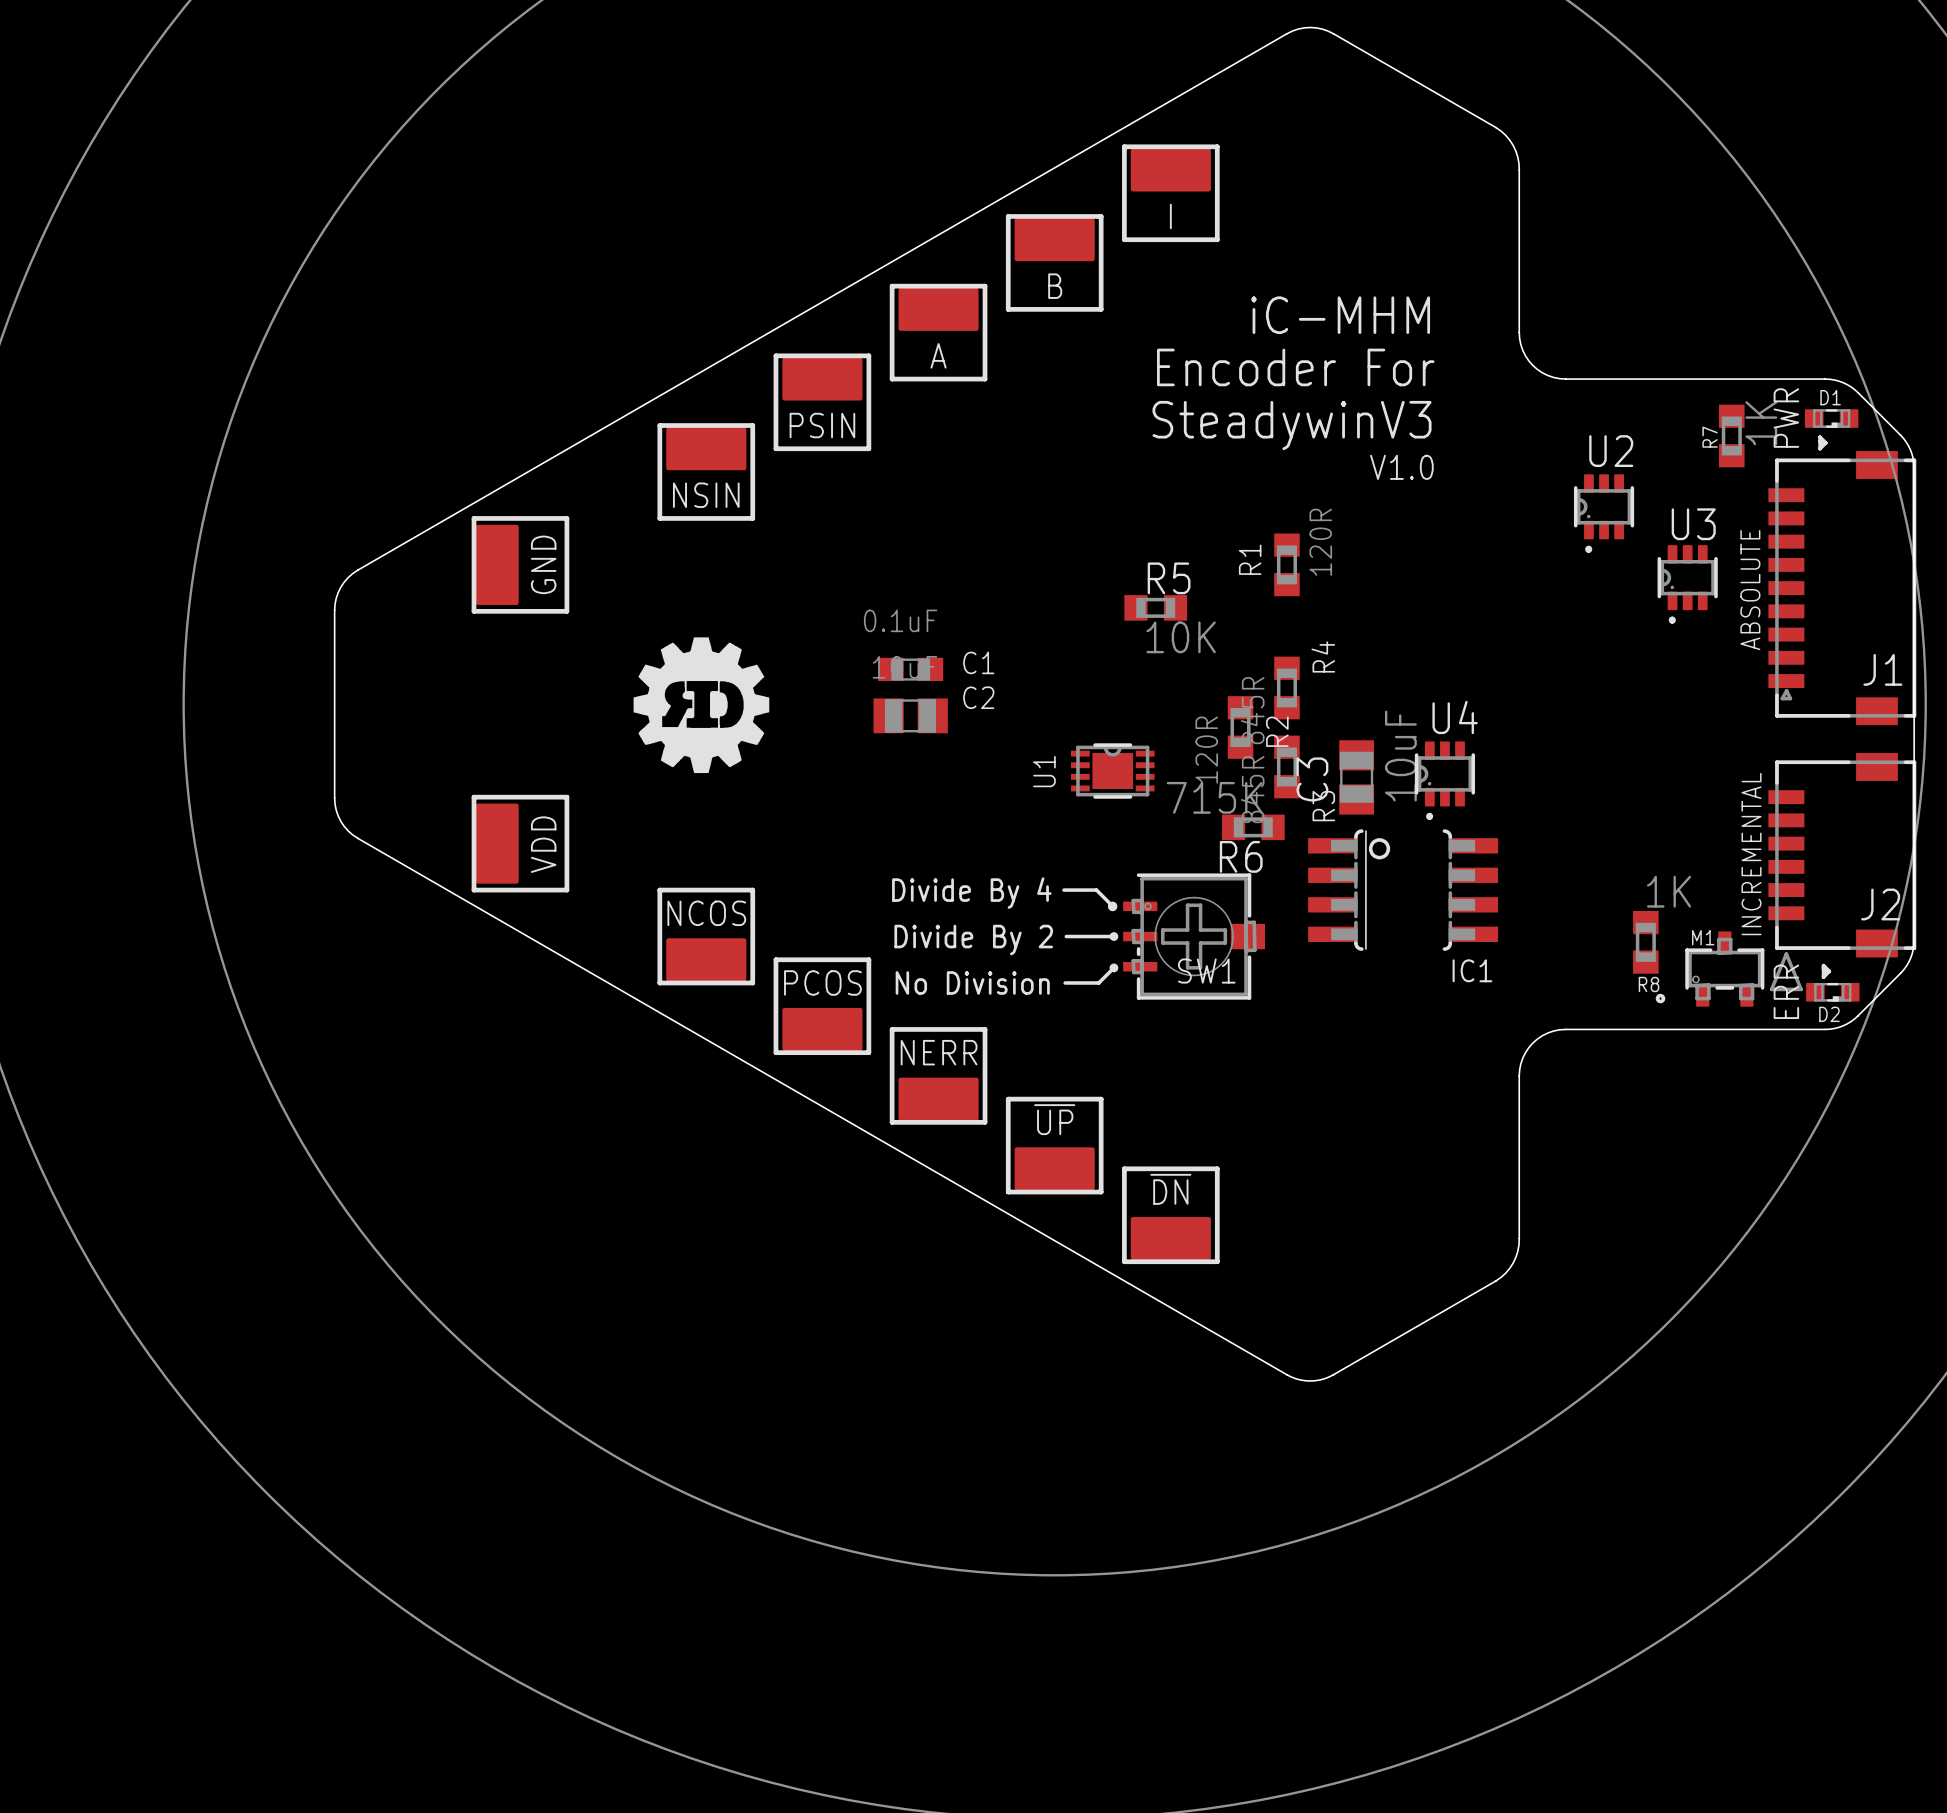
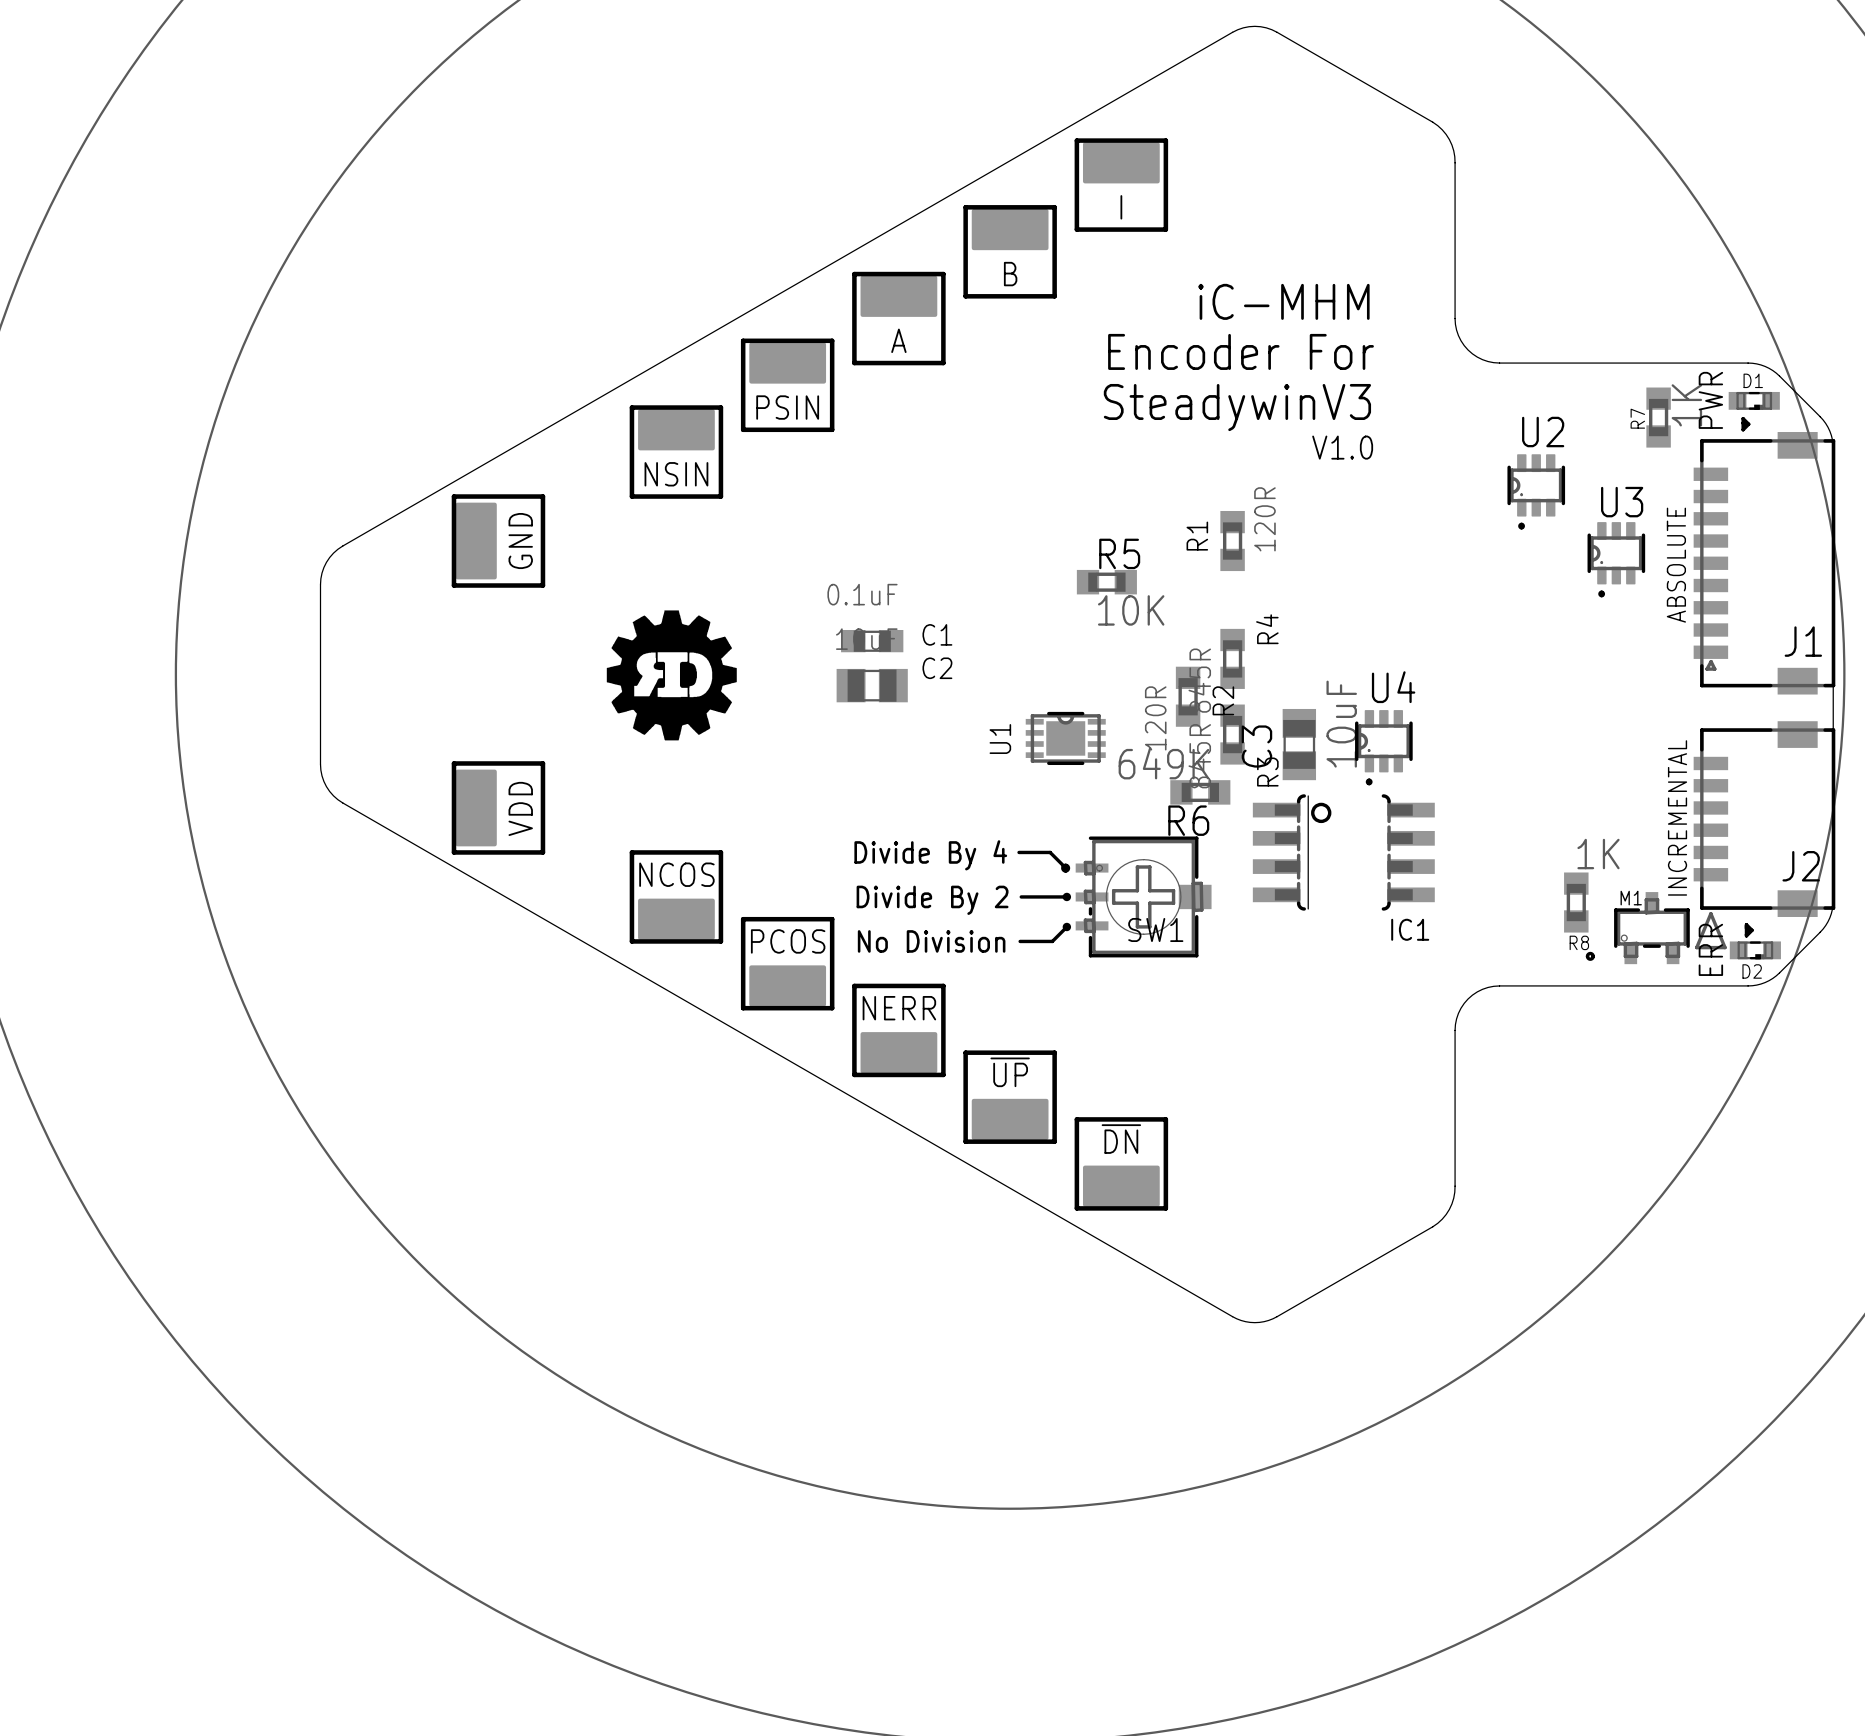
R6 value: 715K (1214, 797) -> 649K (1163, 763)

